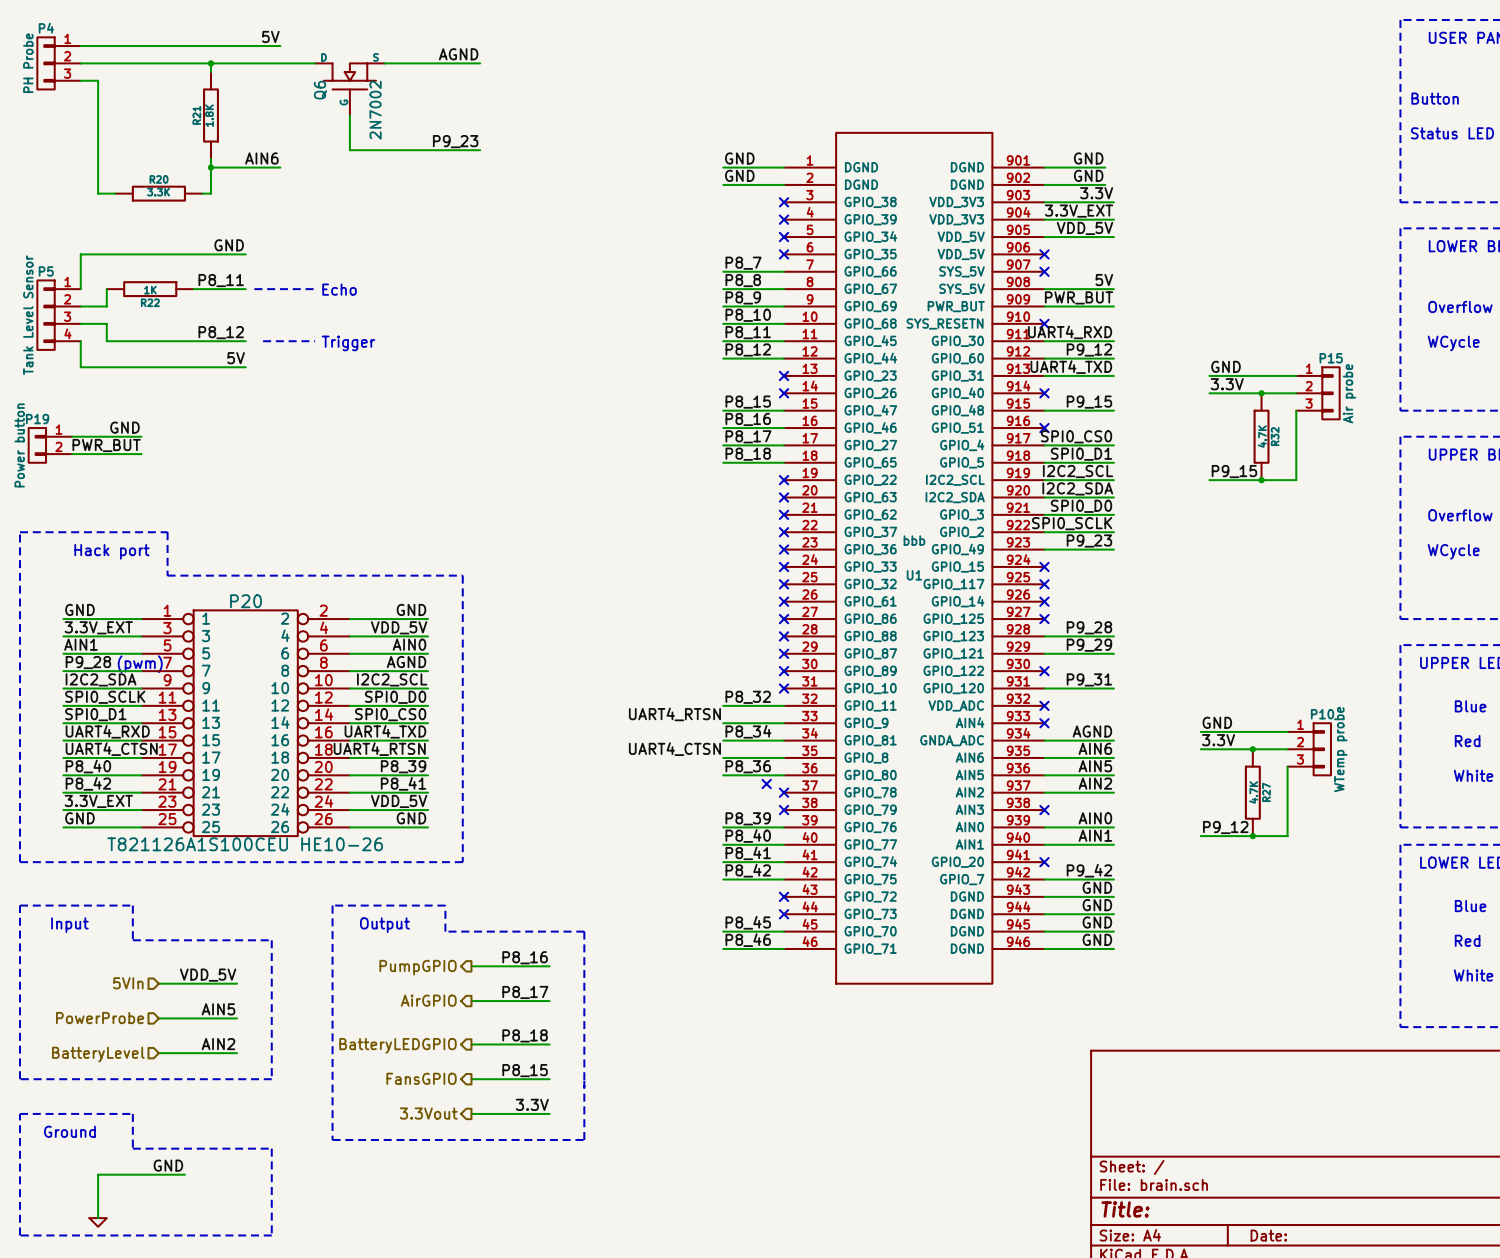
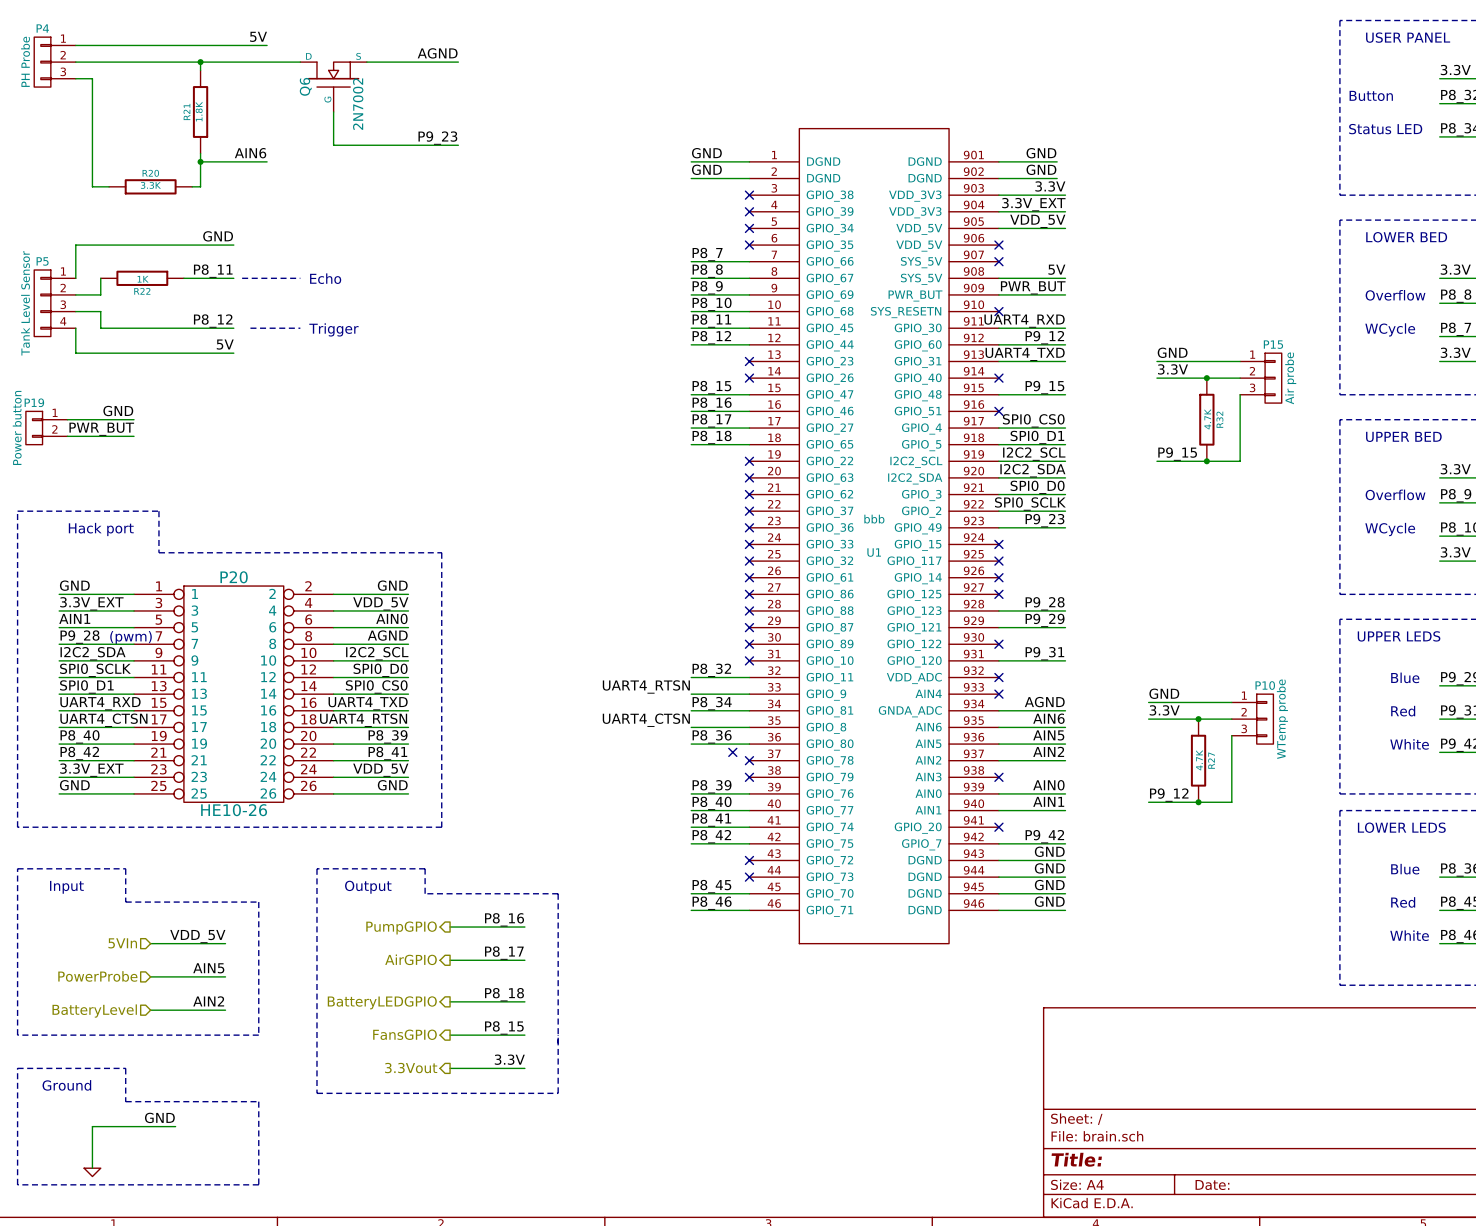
P20 value: T821126A1S100CEU HE10-26 (245, 844) -> HE10-26 (234, 810)

